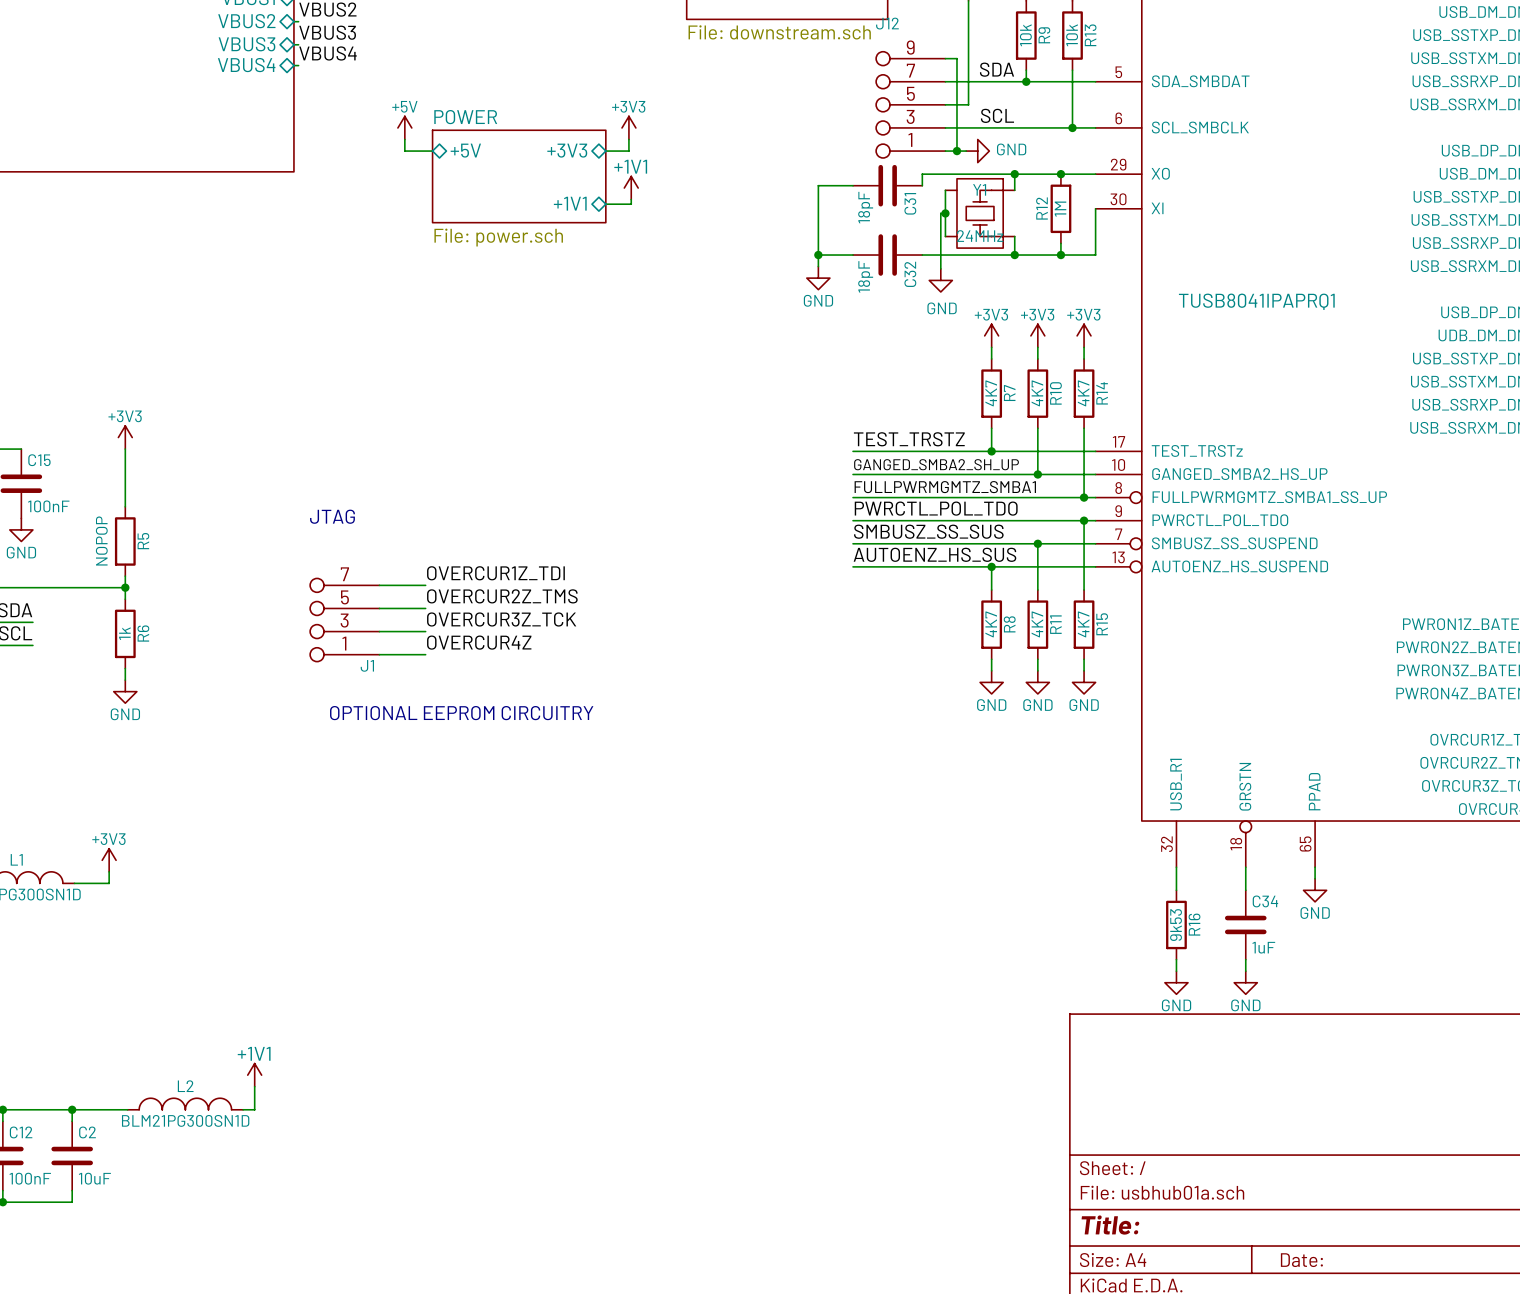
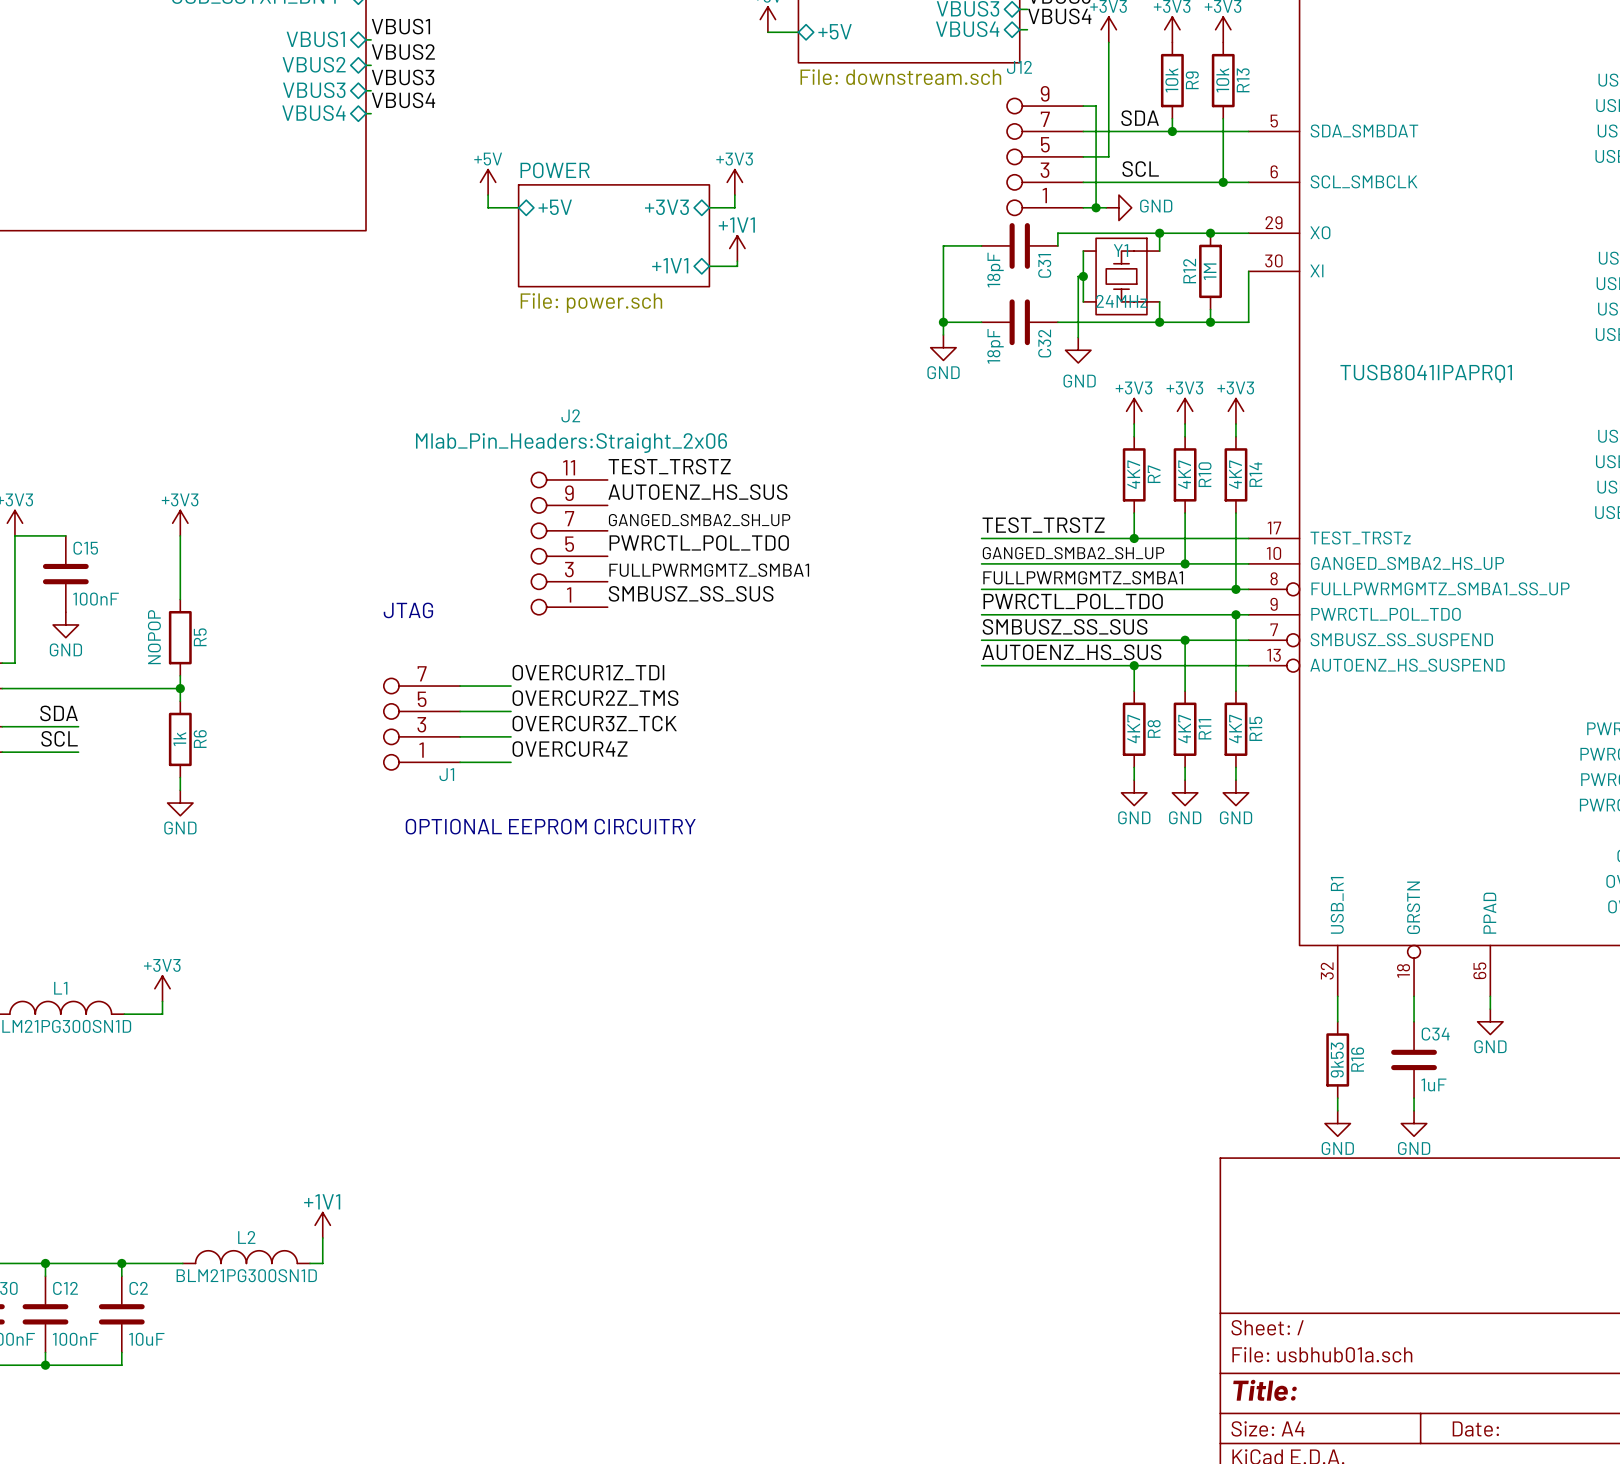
label: none -> TEST_TRSTZ (669, 466)
label: none -> AUTOENZ_HS_SUS (697, 492)
label: none -> GANGED_SMBA2_SH_UP (699, 520)
label: none -> PWRCTL_POL_TDO (699, 542)
J2: none -> (569, 543)
label: none -> FULLPWRMGMTZ_SMBA1 (709, 570)
label: none -> SMBUSZ_SS_SUS (691, 593)

